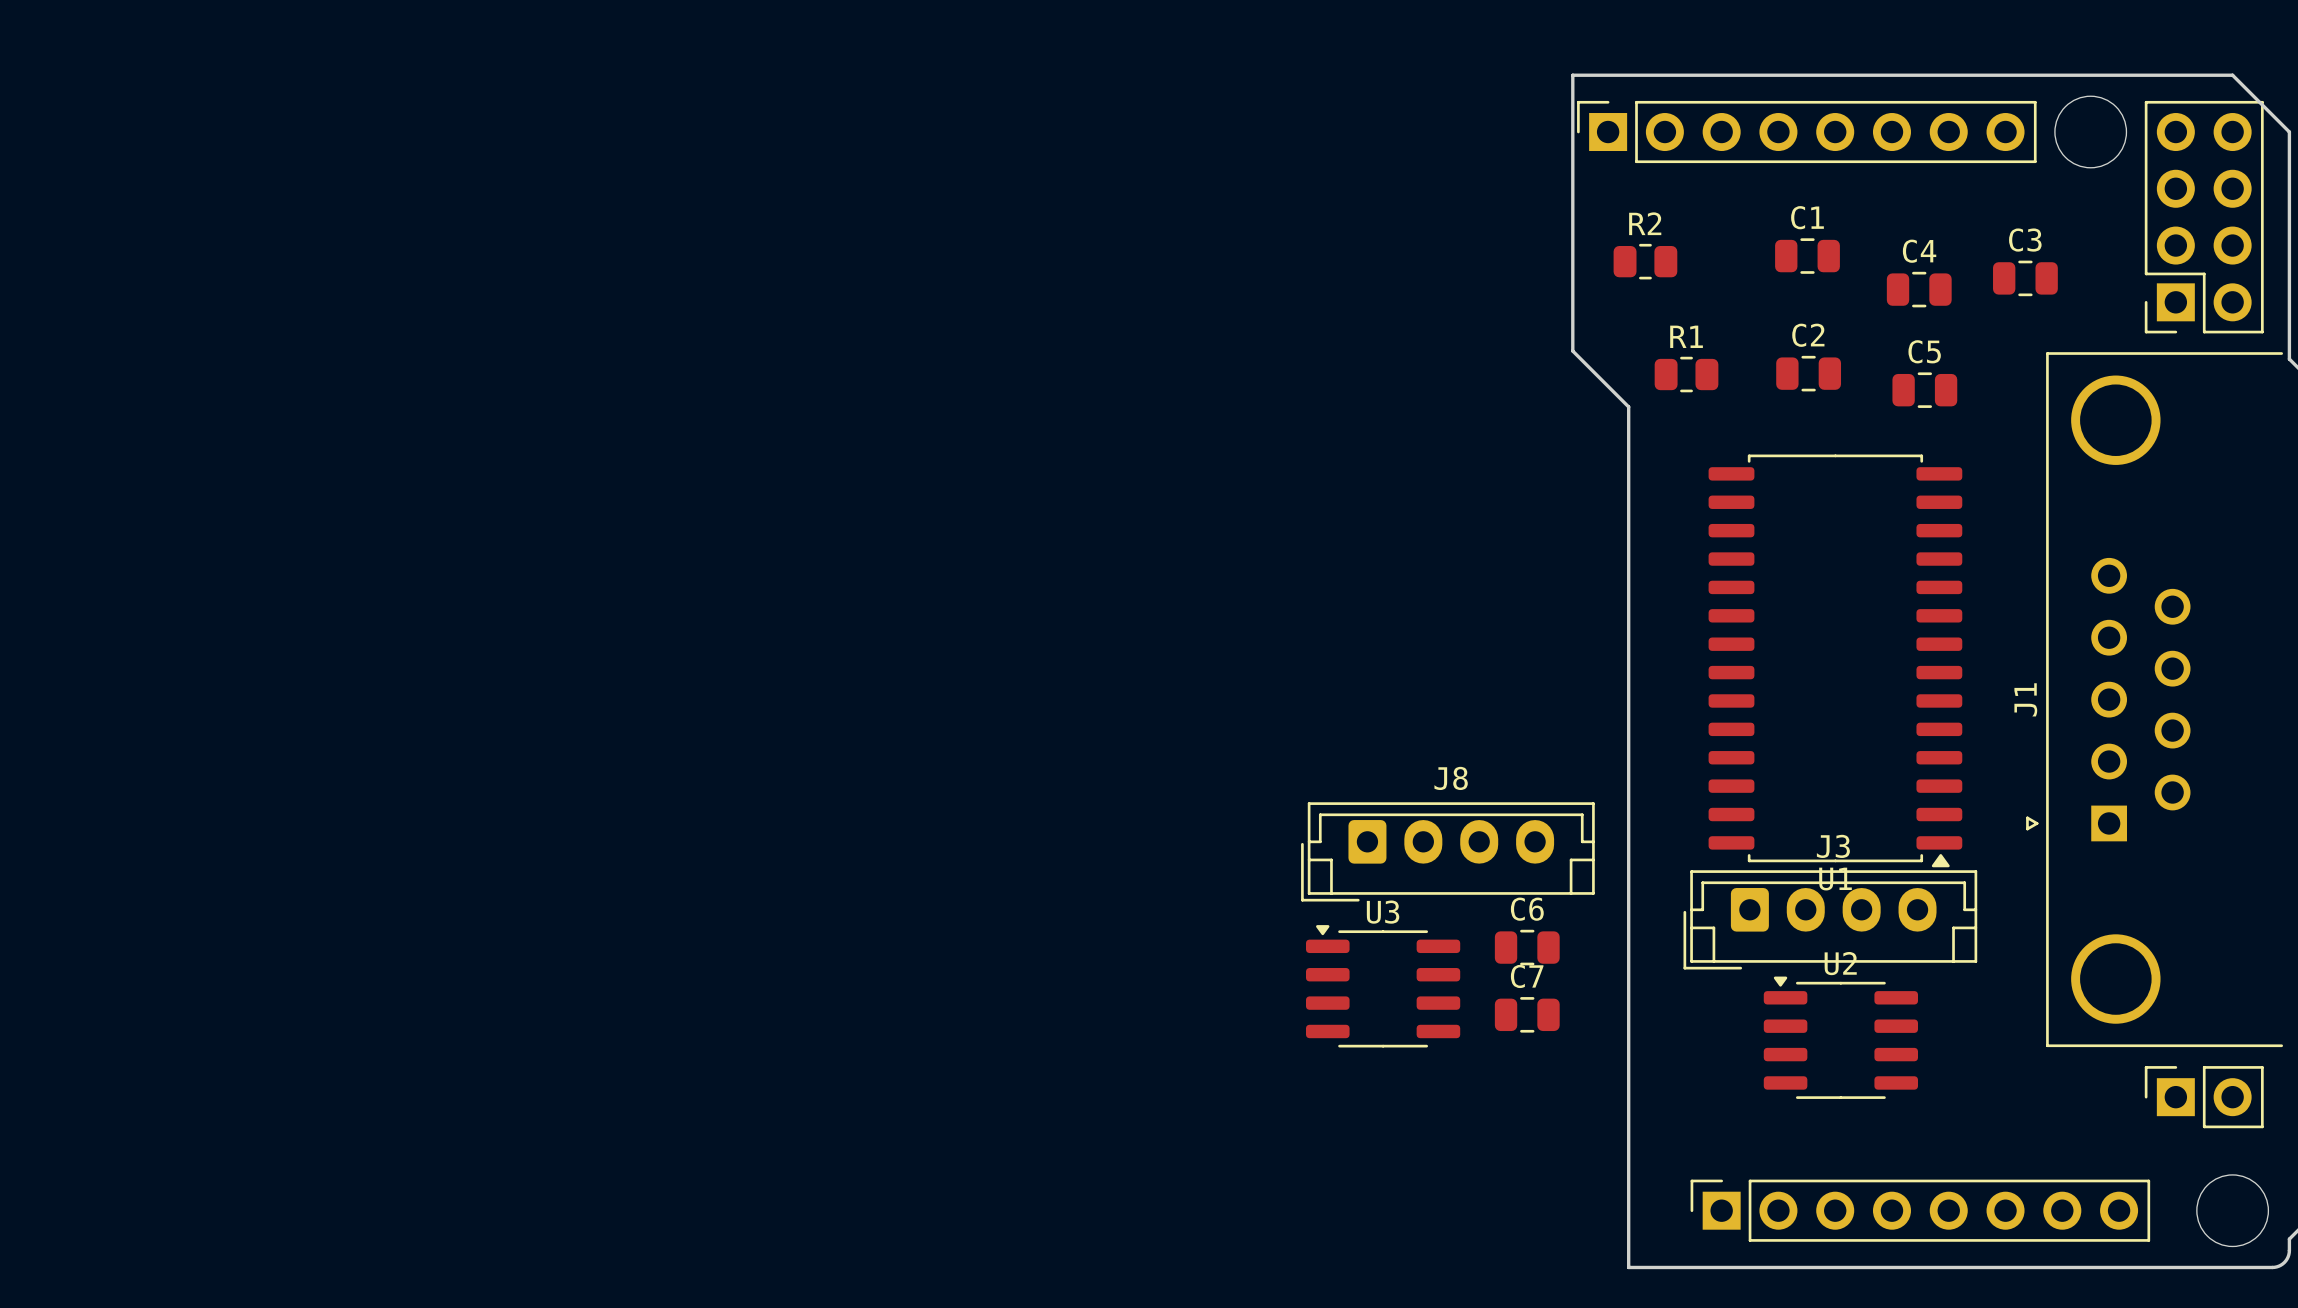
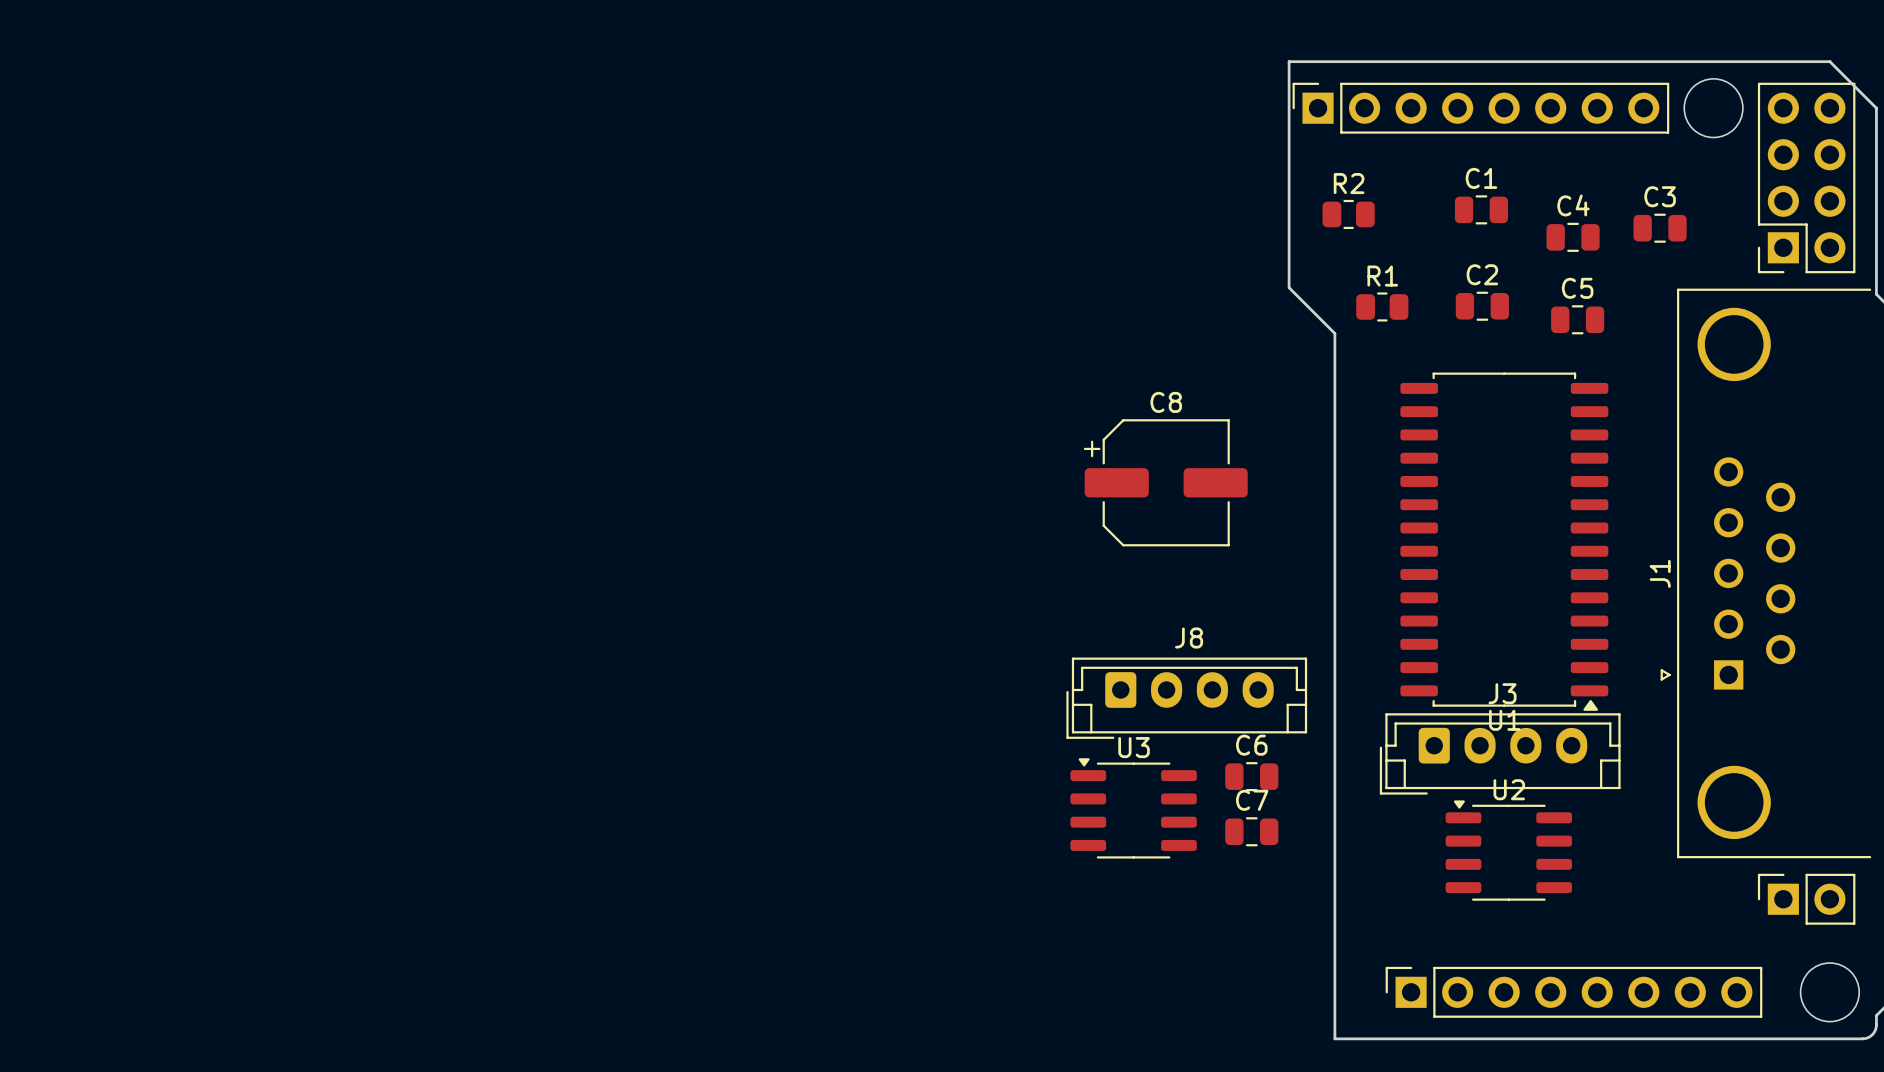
C8: none -> (1165, 482)

